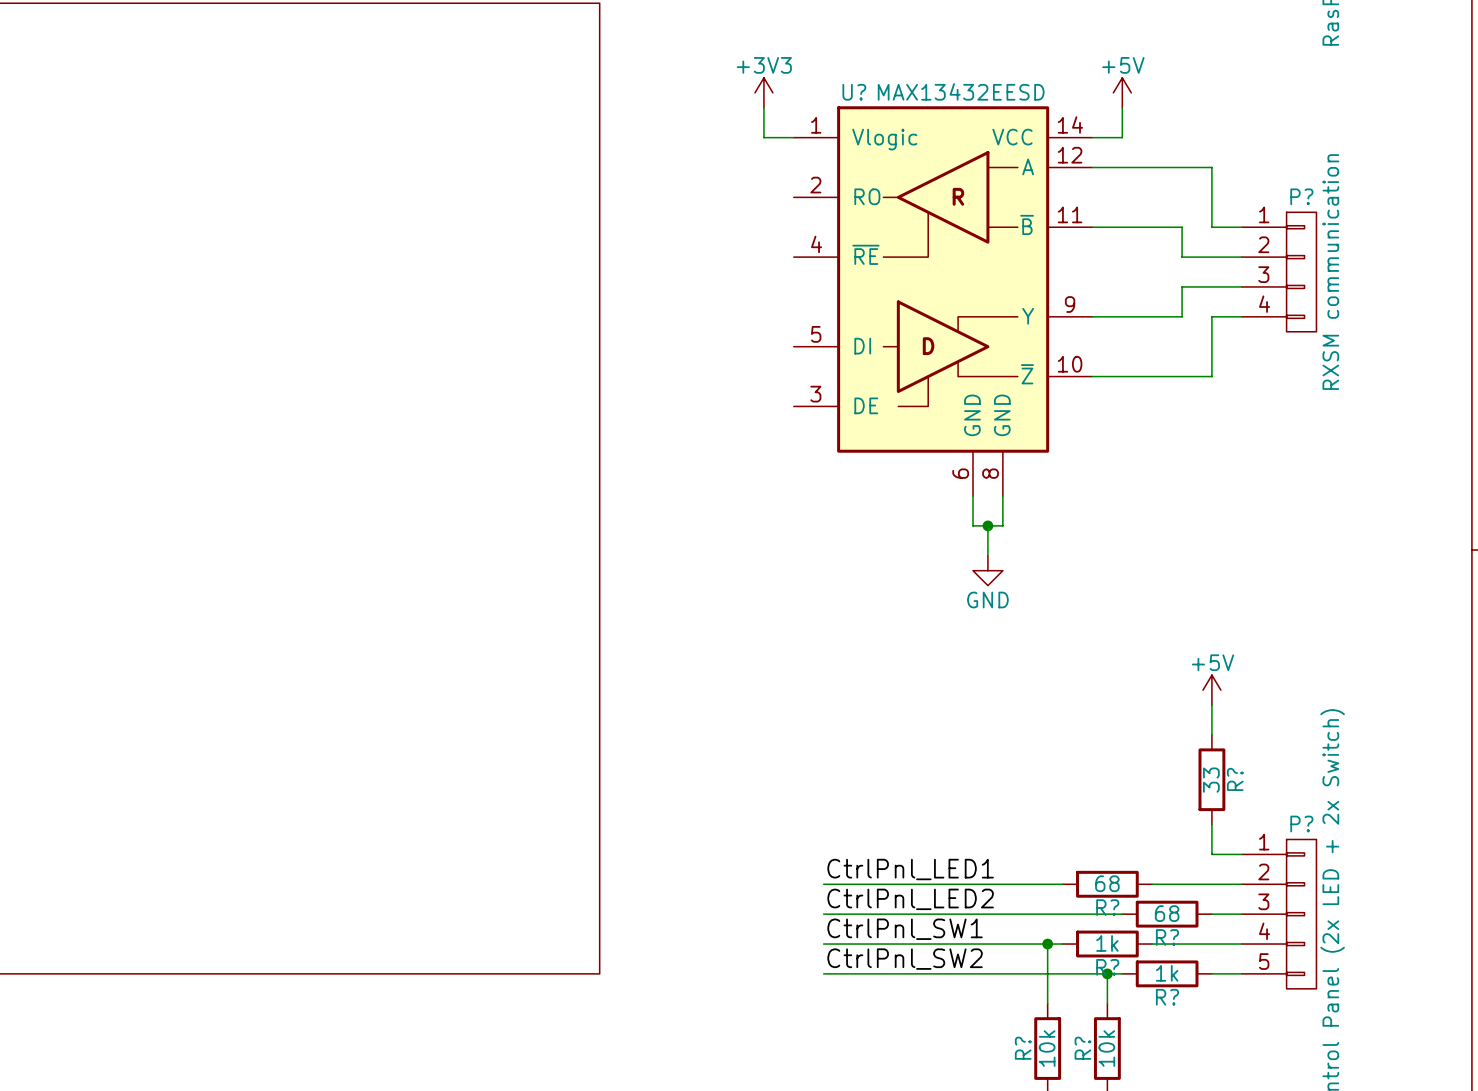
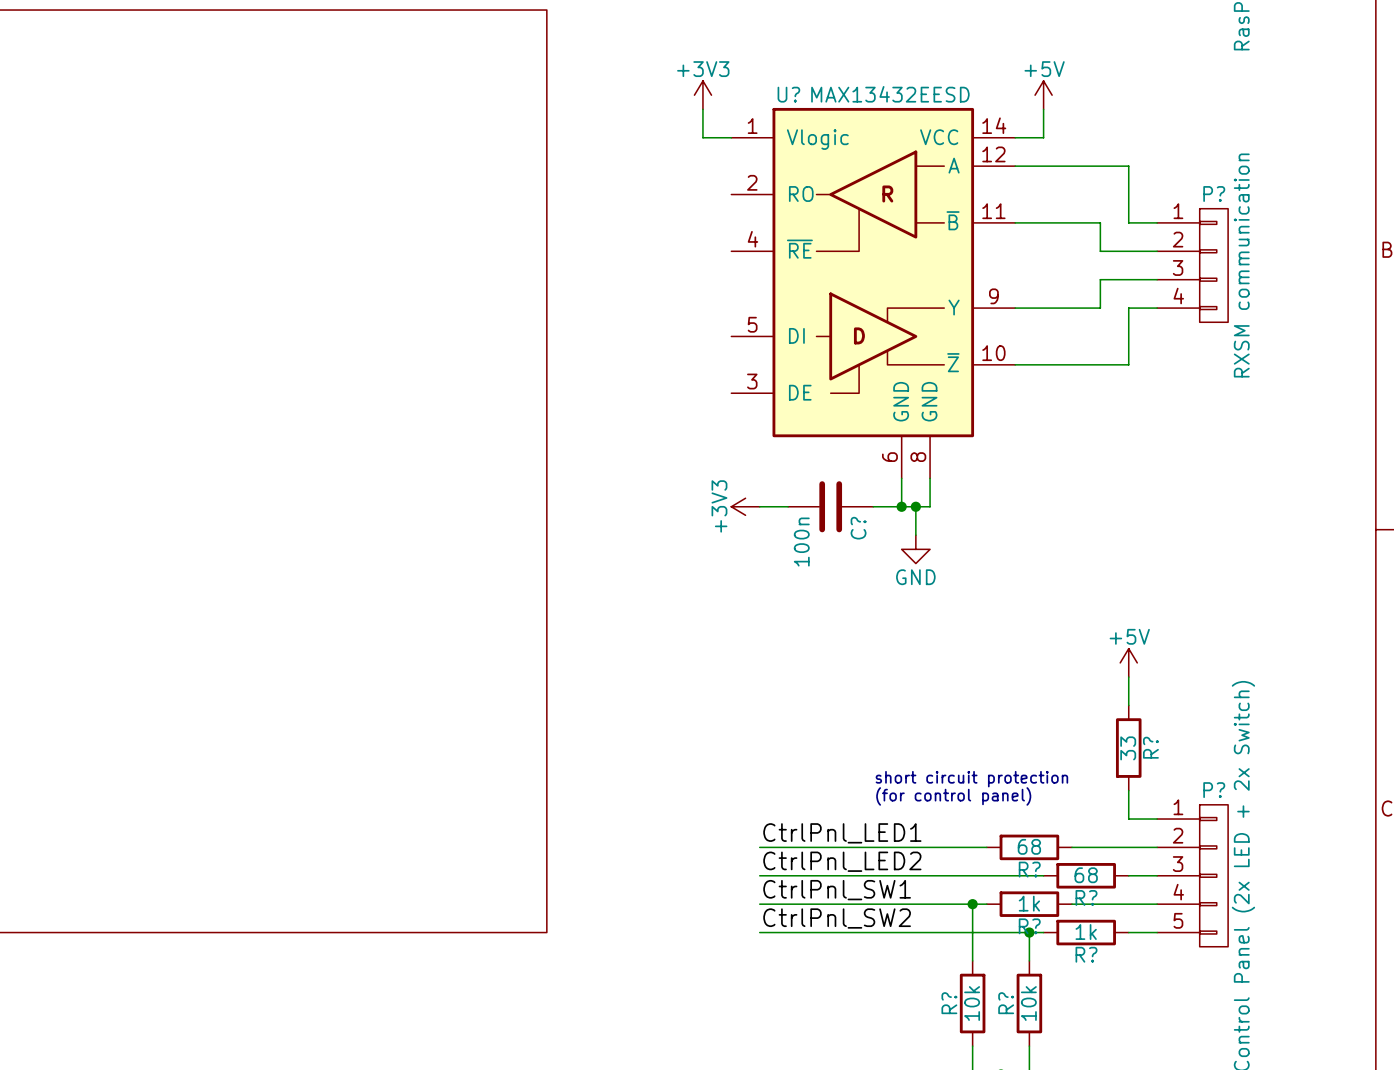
power symbol: none -> +3V3 (745, 506)
wire: none -> (759, 506) (788, 506)
C?: none -> 100n (830, 506)
wire: none -> (873, 506) (901, 506)
junction: none -> (901, 506)
text: none -> short circuit protection (971, 779)
text: none -> (for control panel) (953, 796)

